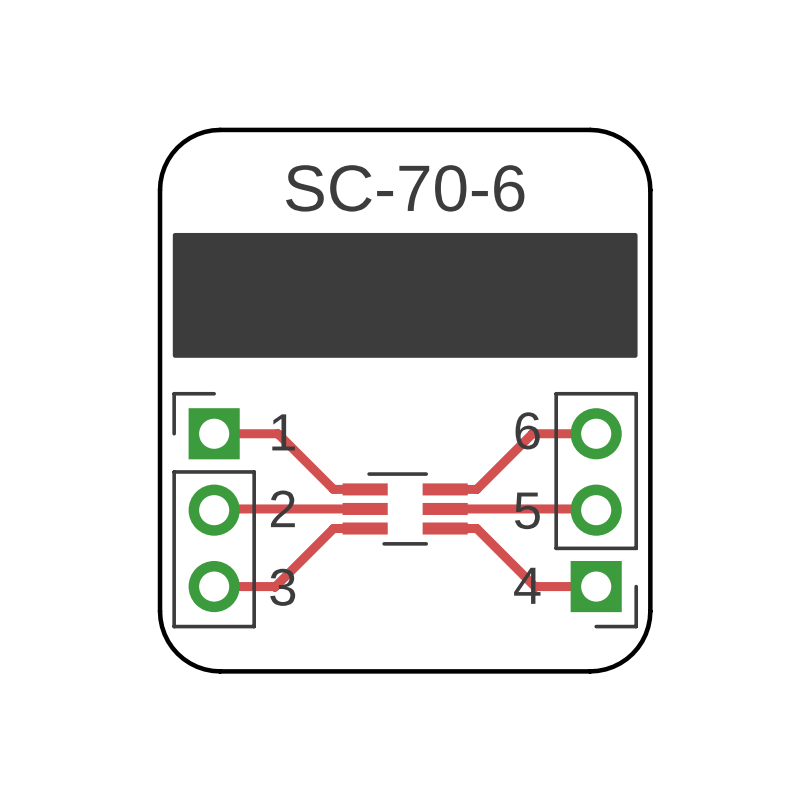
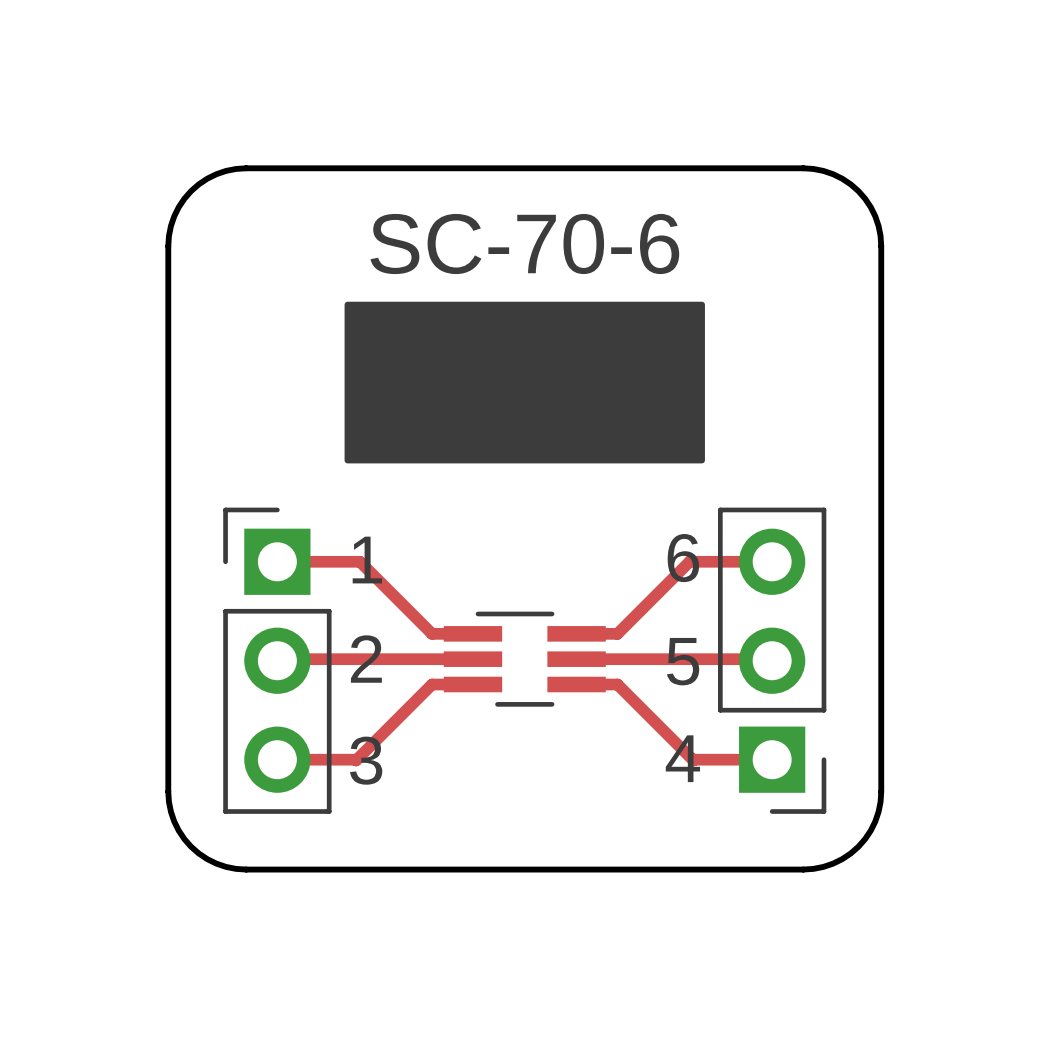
board edge: (220, 129) (197, 134) (177, 147) (164, 167) (160, 190) (160, 619) (164, 634) (177, 653) (197, 666) (220, 671) -> (285, 168) (236, 168) (207, 178) (191, 191) (178, 207) (170, 226) (168, 246) (168, 801) (174, 821) (184, 839) (207, 859) (236, 868) (285, 869)
board edge: (590, 129) (613, 134) (632, 147) (645, 167) (650, 190) (649, 619) (642, 641) (626, 658) (613, 666) (590, 671) -> (764, 168) (813, 168) (842, 178) (858, 191) (870, 207) (878, 226) (881, 246) (880, 801) (870, 830) (858, 846) (842, 859) (813, 868) (764, 869)
drawing shape: [172, 232, 638, 358] -> [344, 301, 705, 464]

